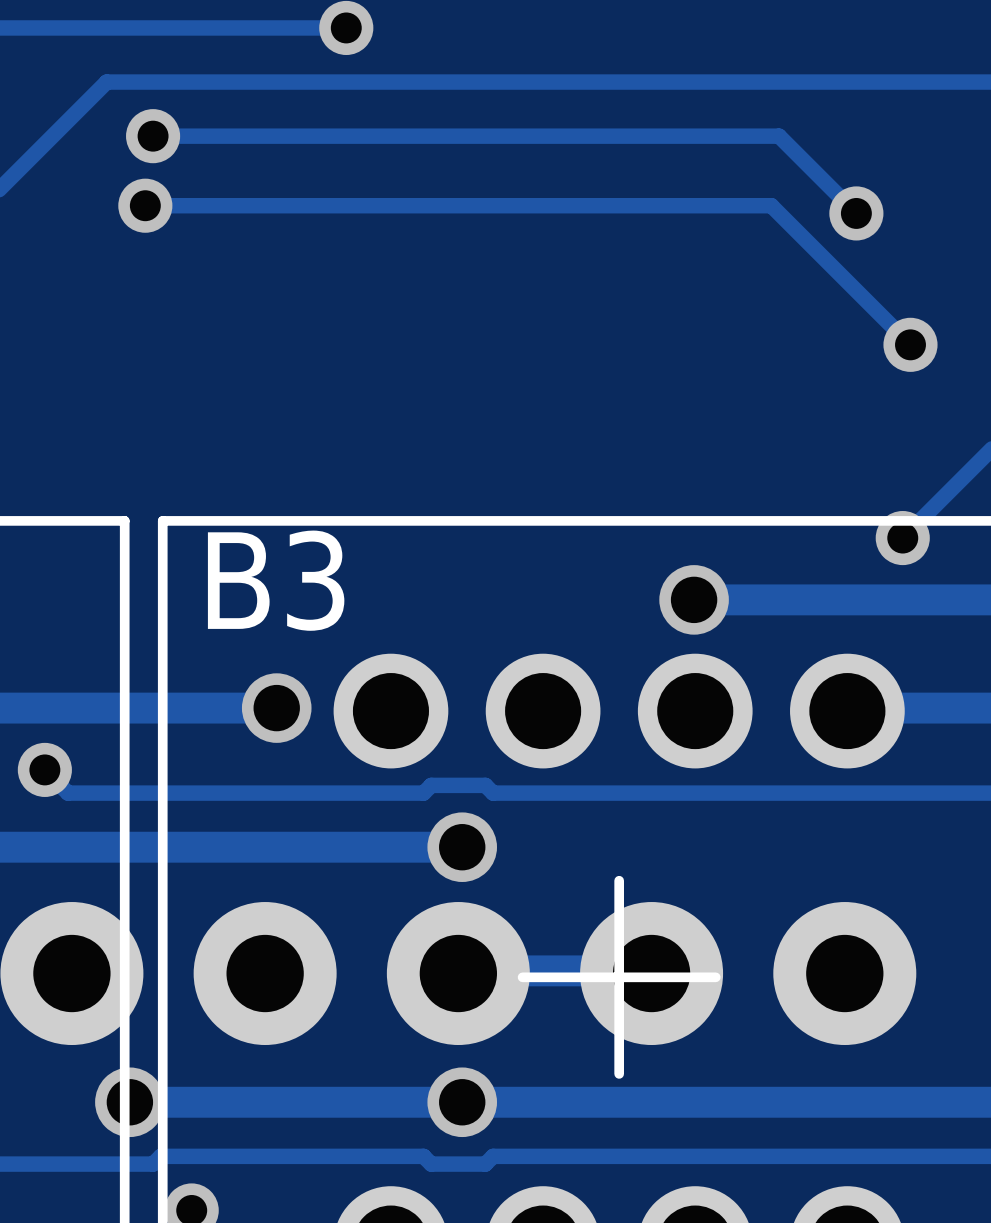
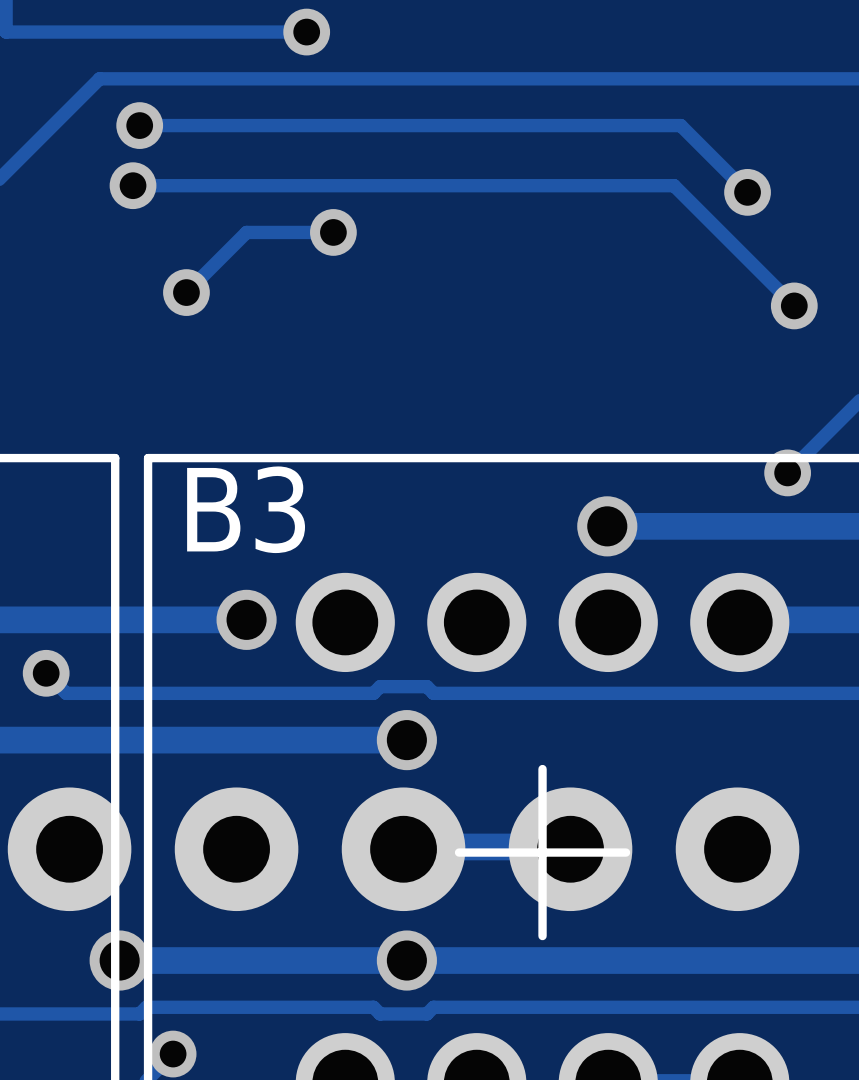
track: none -> (333, 232) (246, 232) (186, 292)
via: none -> (333, 232)
via: none -> (186, 292)

